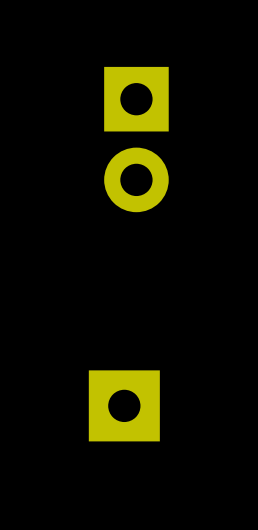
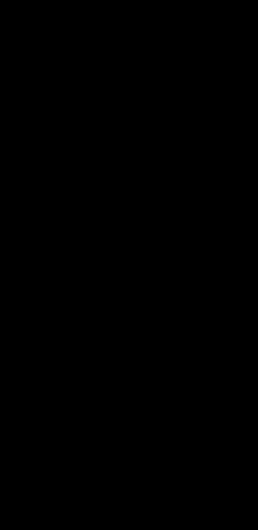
part: (136, 139) -> none
part: (124, 405) -> none

